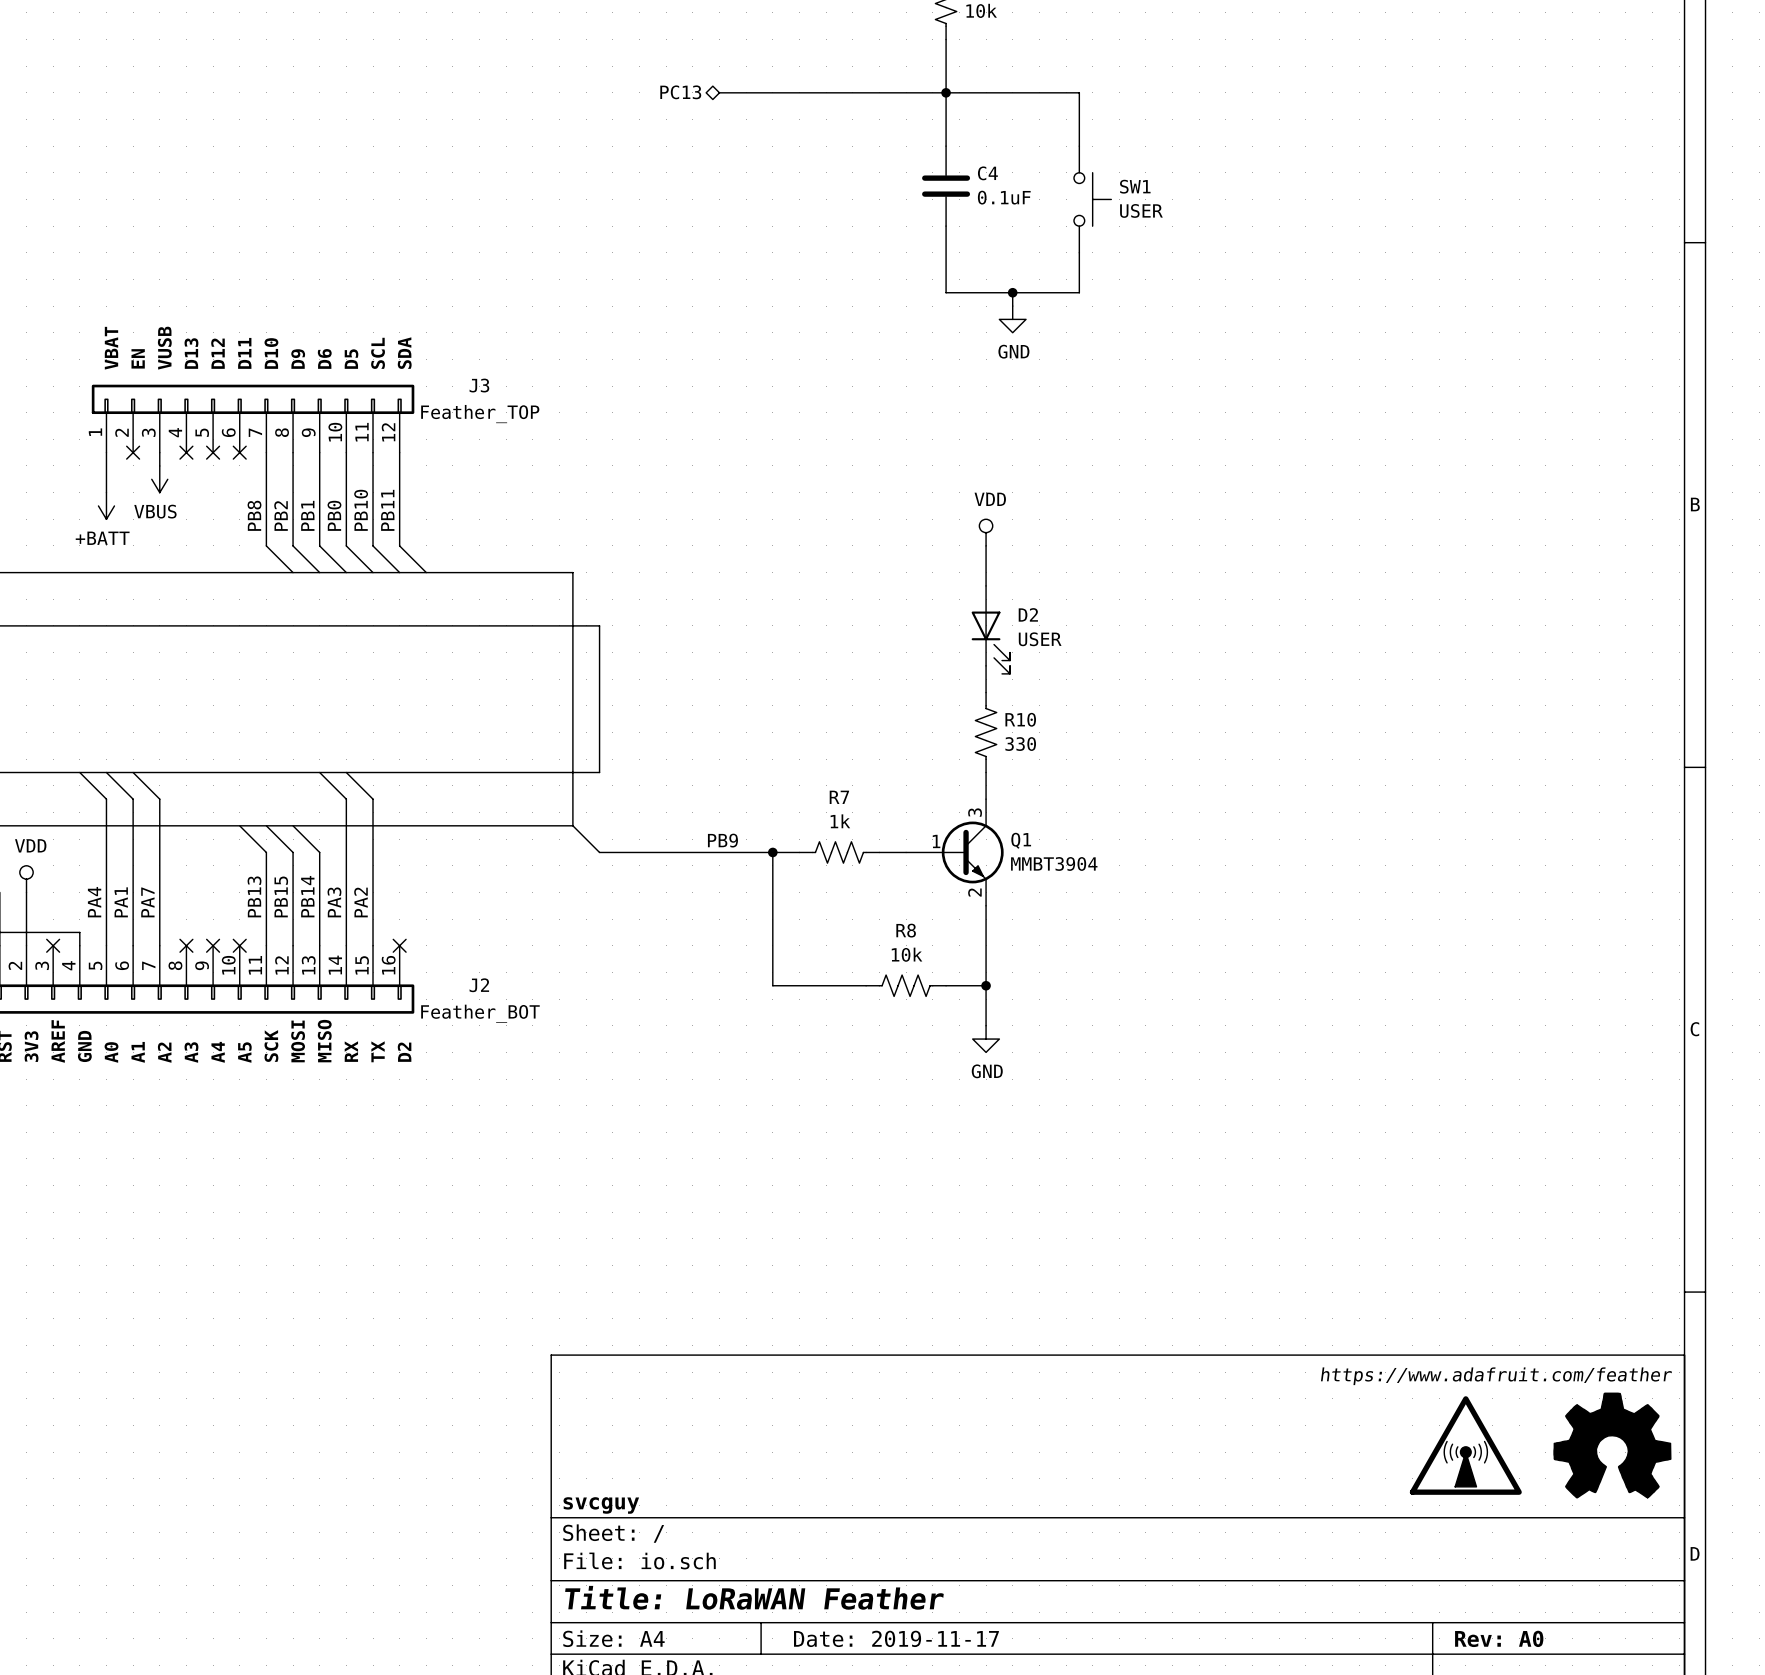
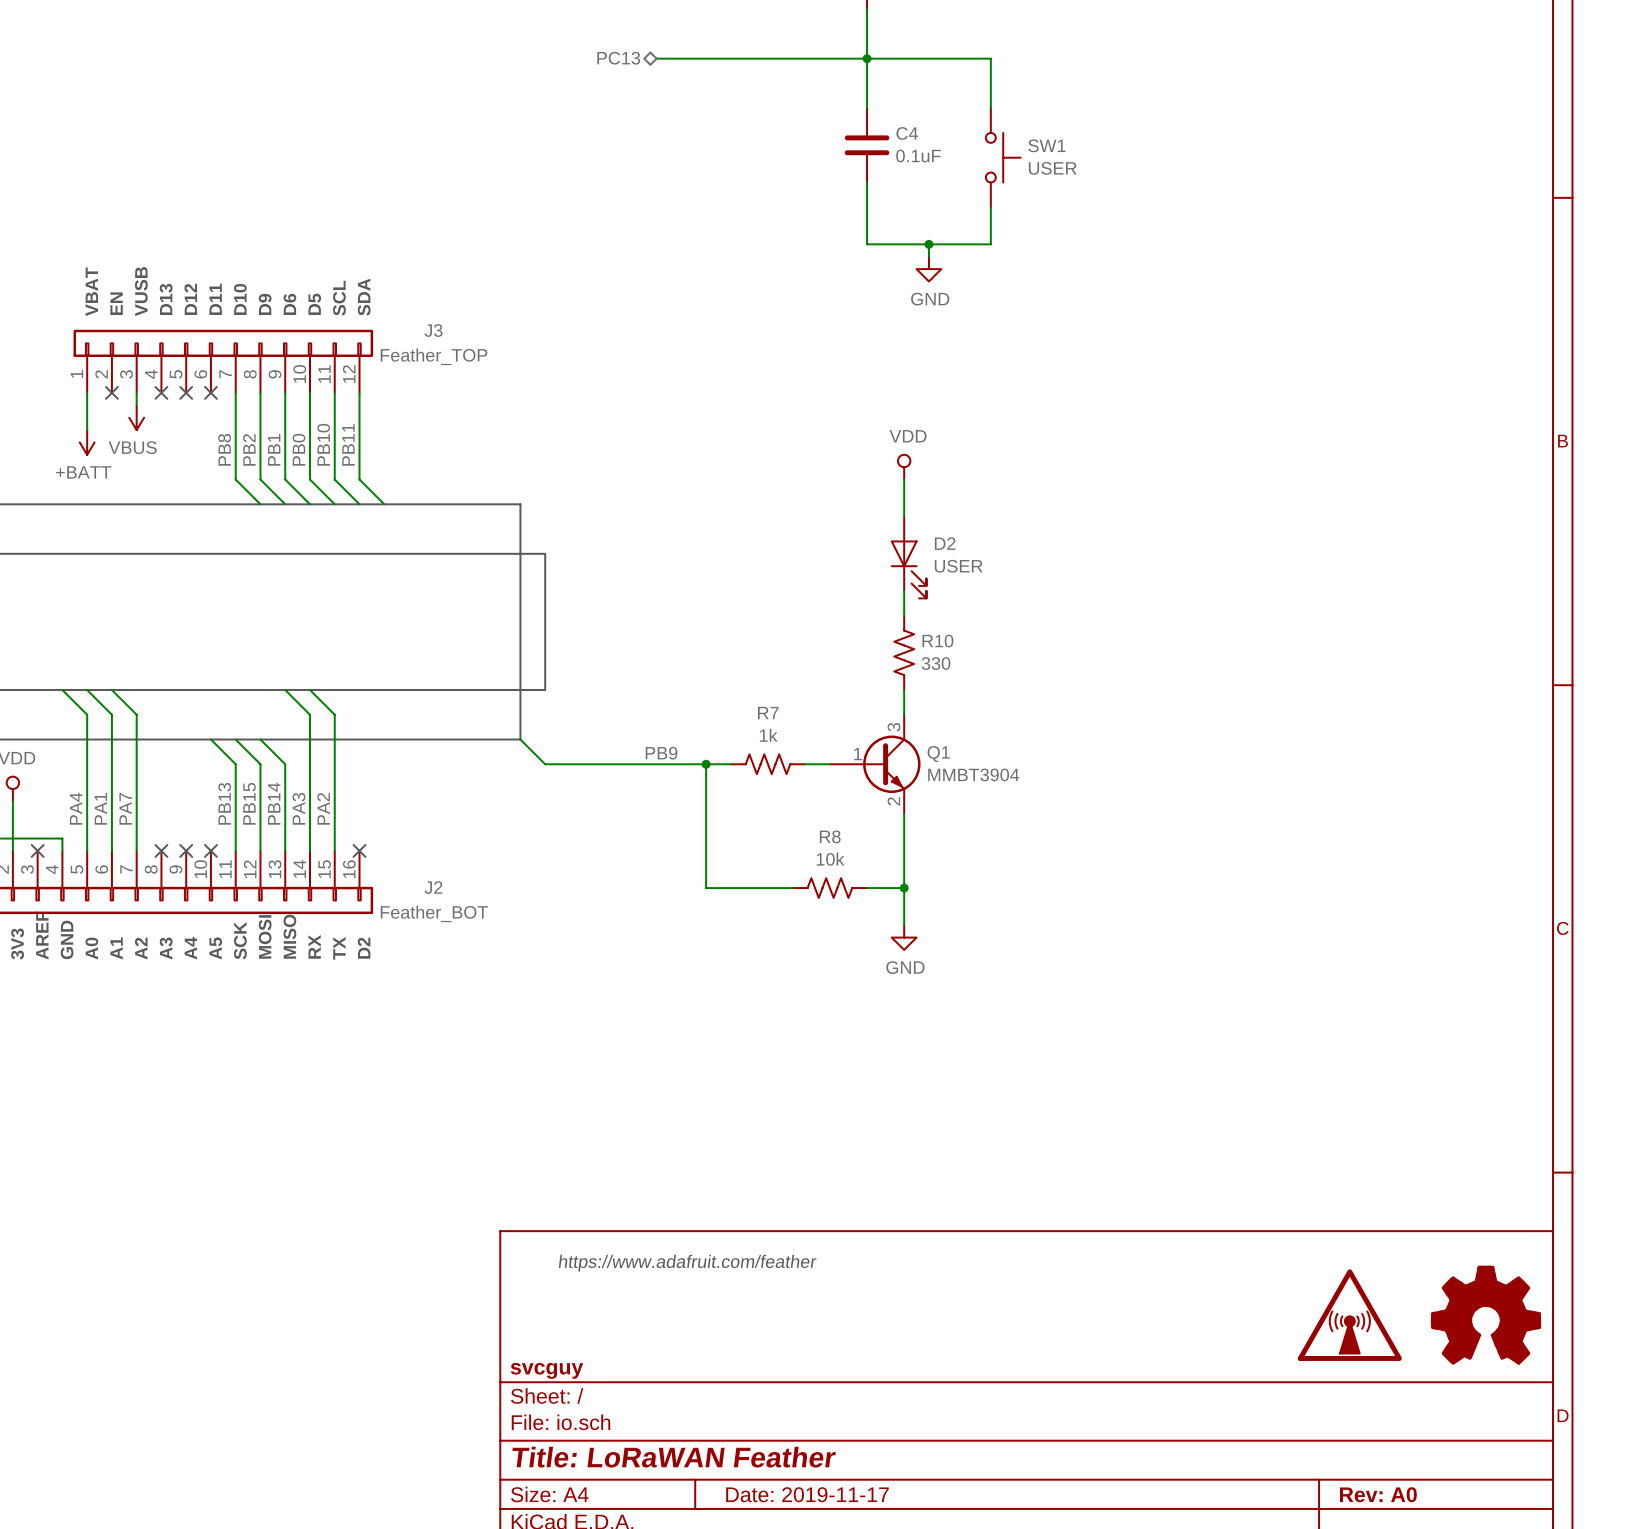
text: https://www.adafruit.com/feather (1496, 1376) -> none
text: none -> https://www.adafruit.com/feather (687, 1263)

